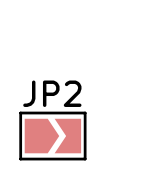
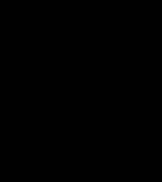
JP2: (52, 136) -> none

